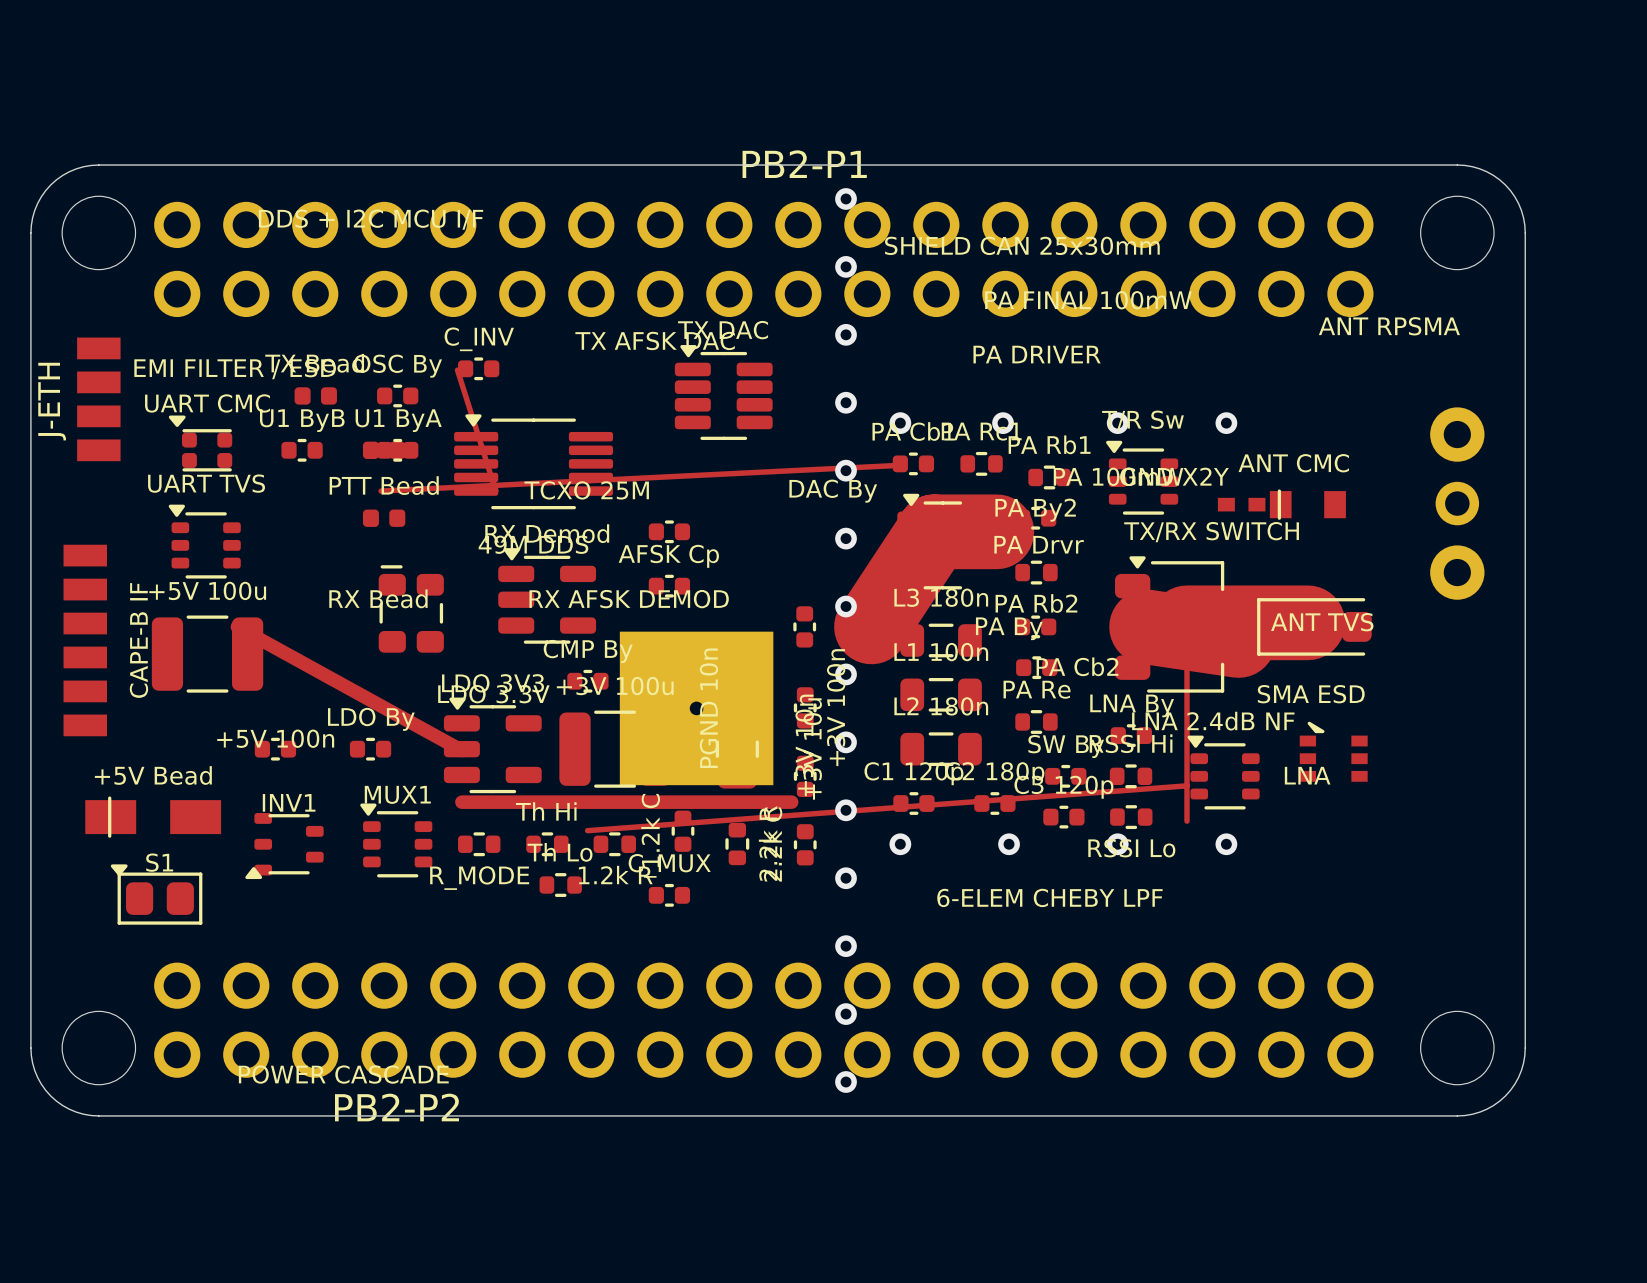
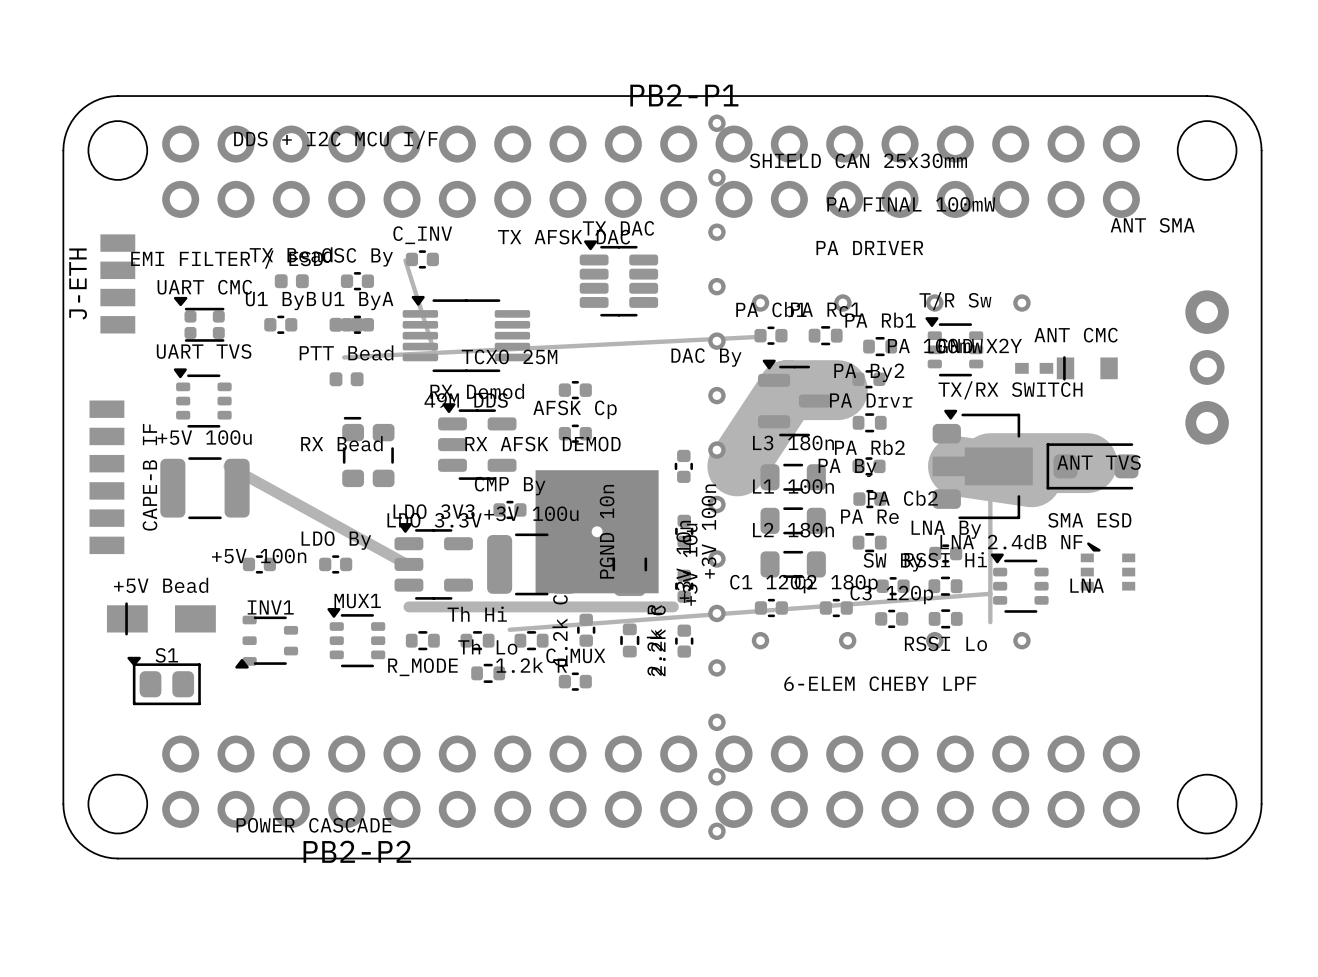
ANT RPSMA name: ANT RPSMA (1389, 326) -> ANT SMA (1152, 225)

